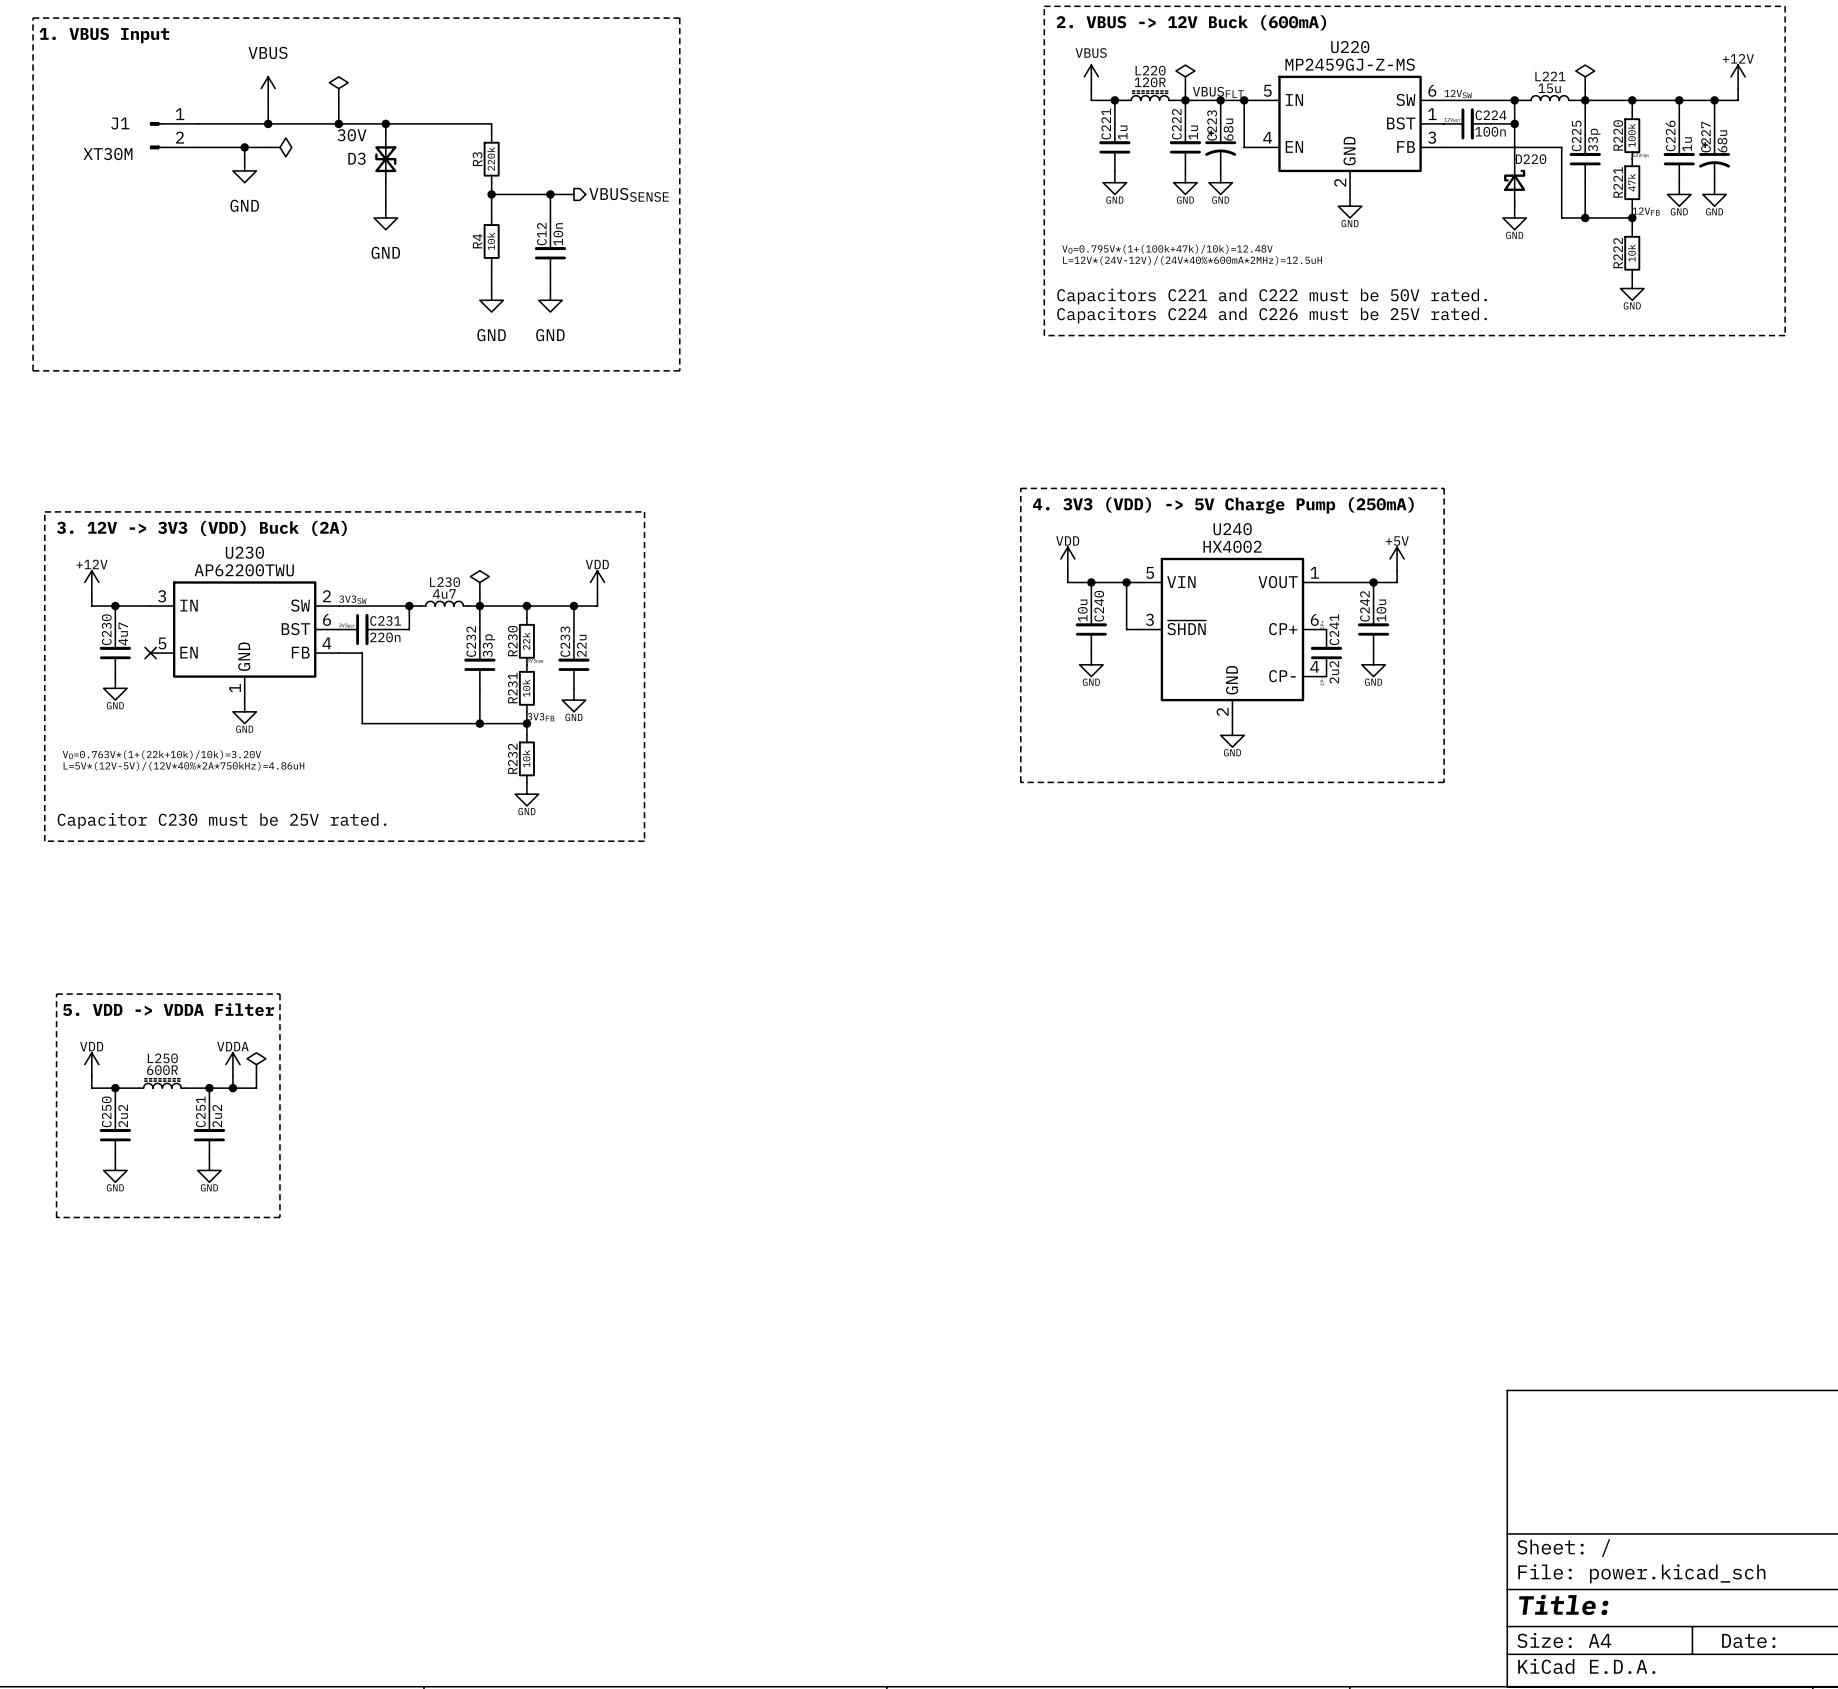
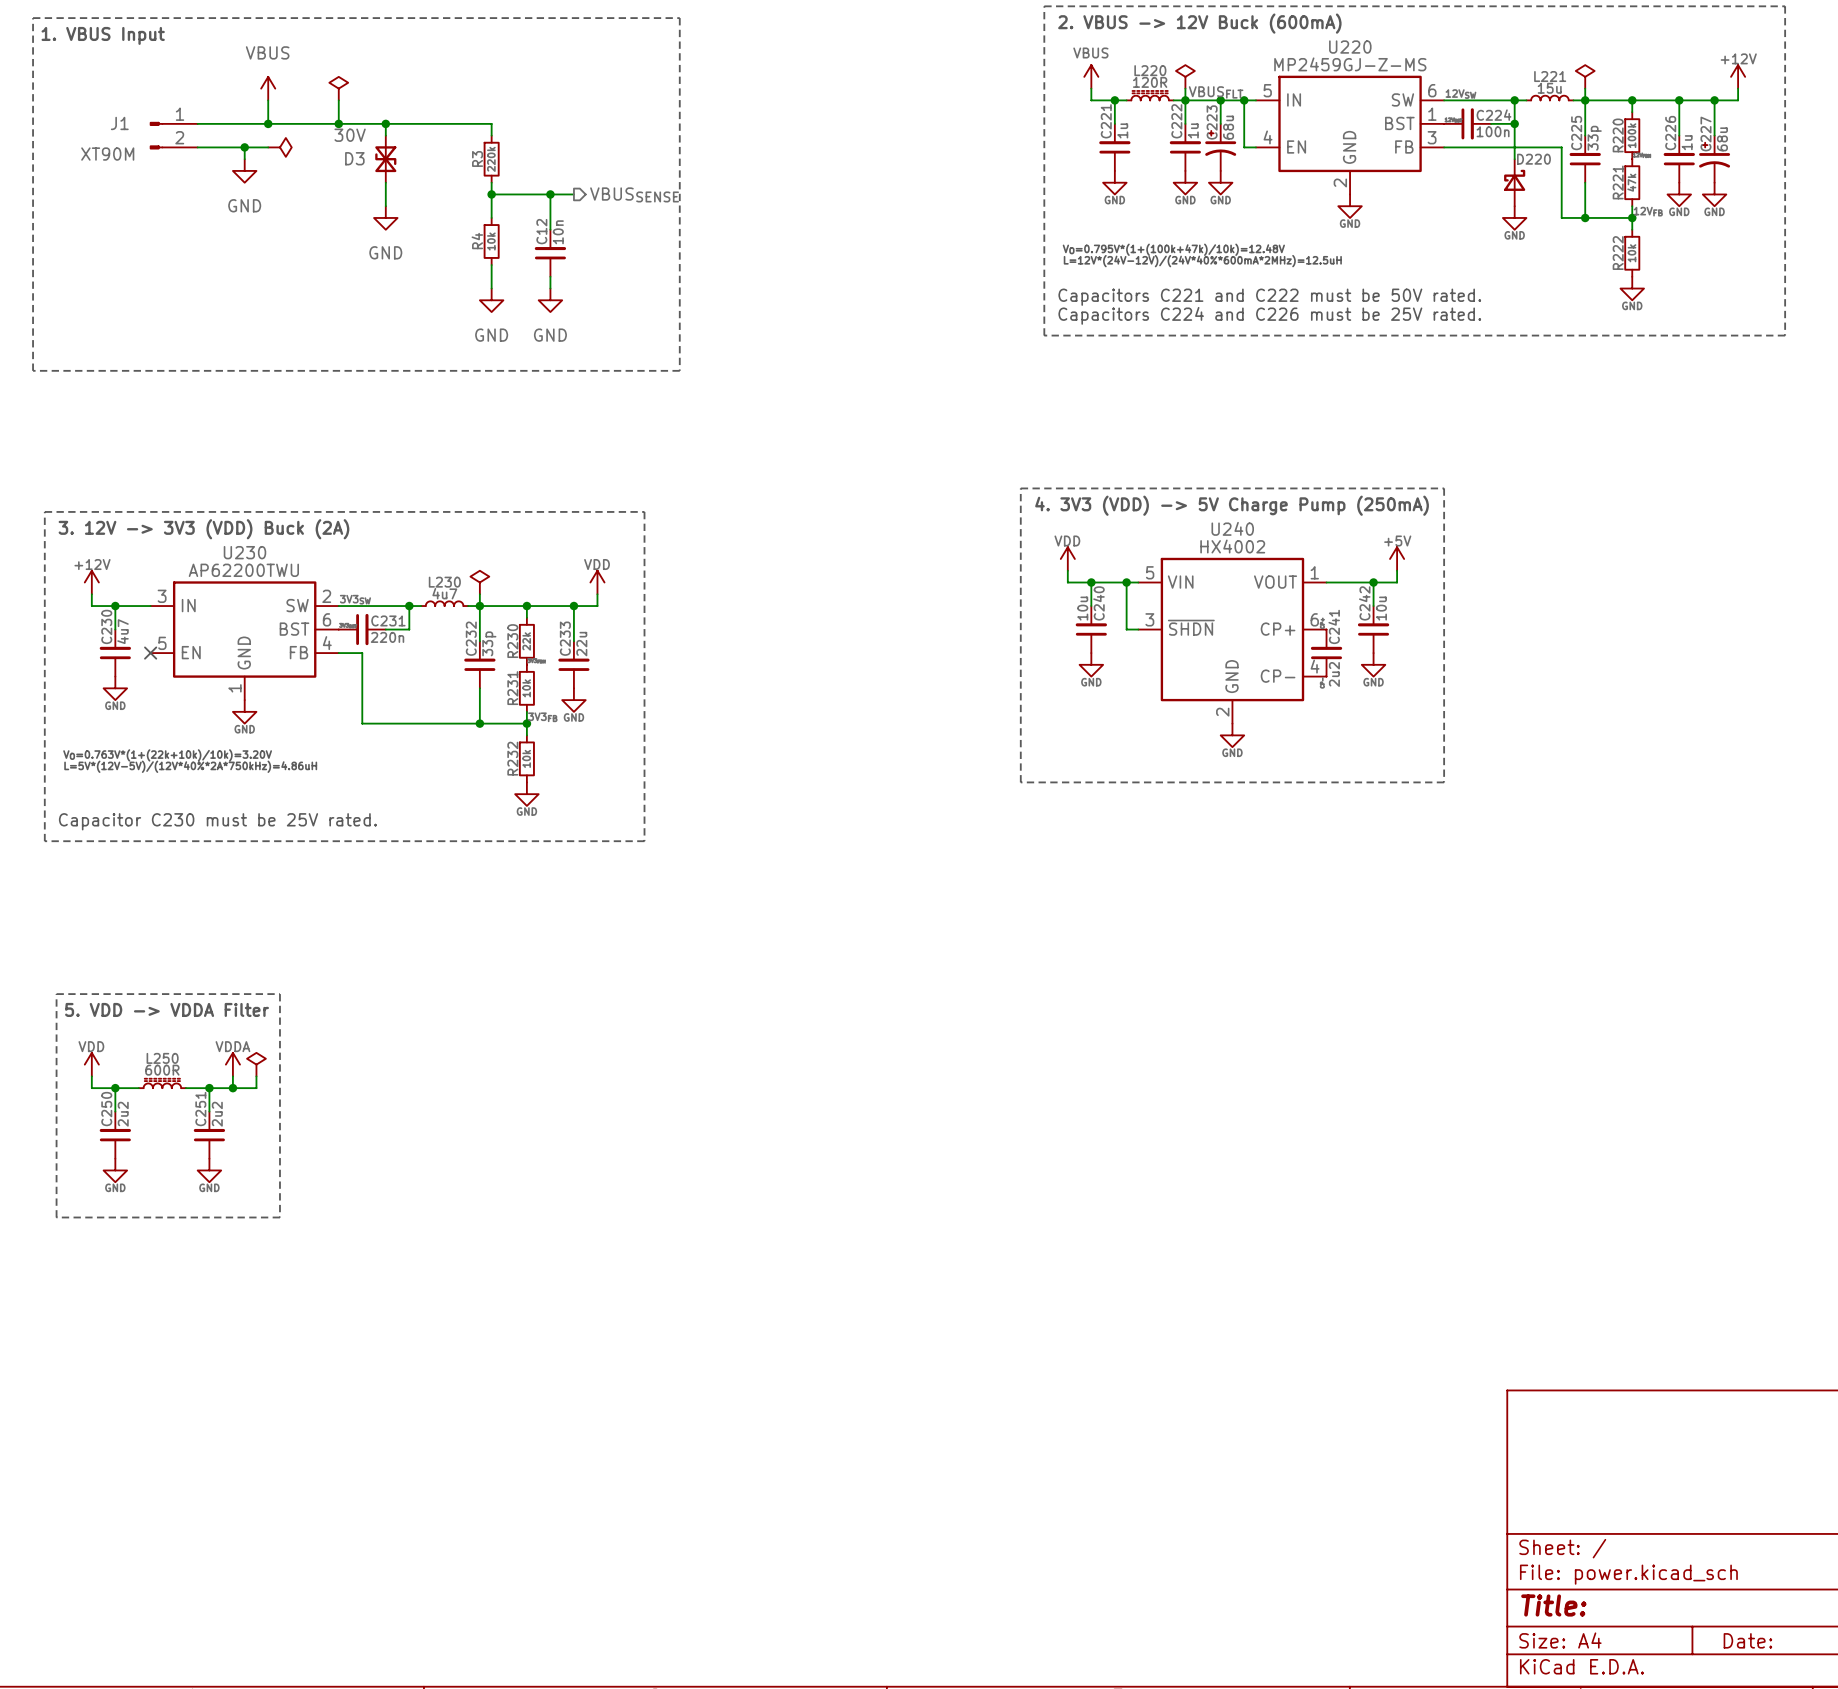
J1 value: XT30M (107, 154) -> XT90M (107, 154)

